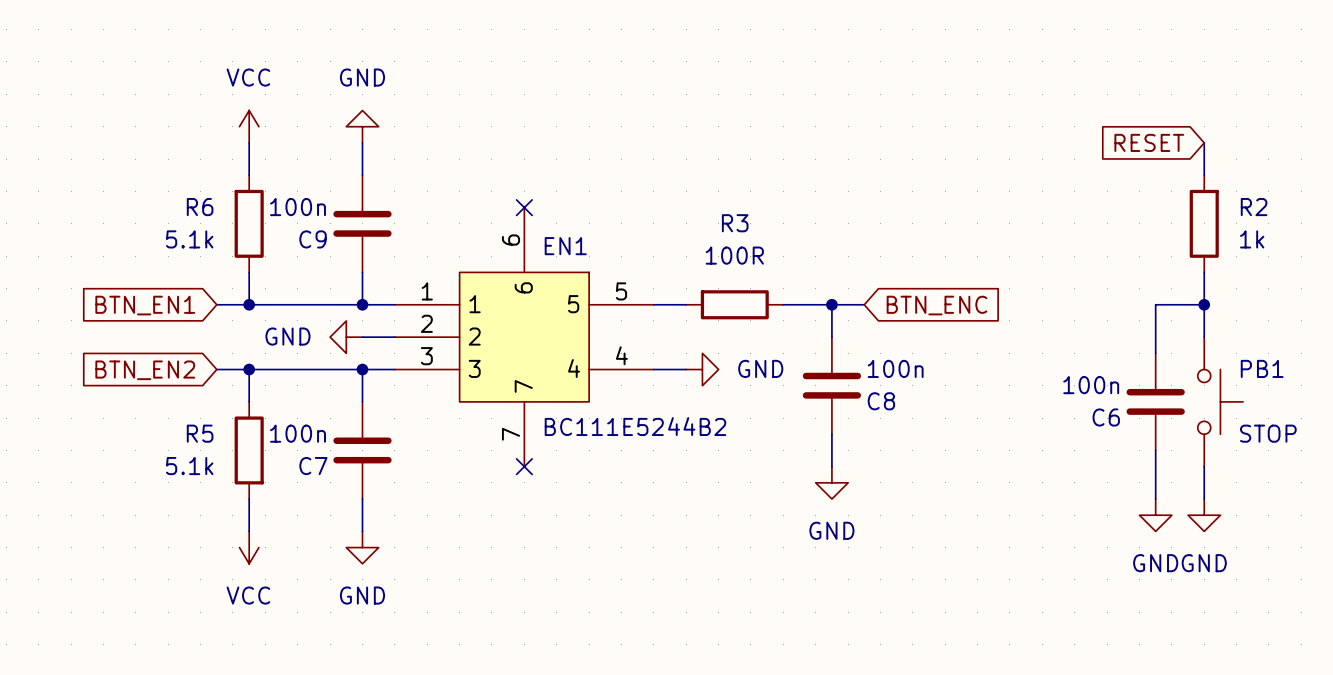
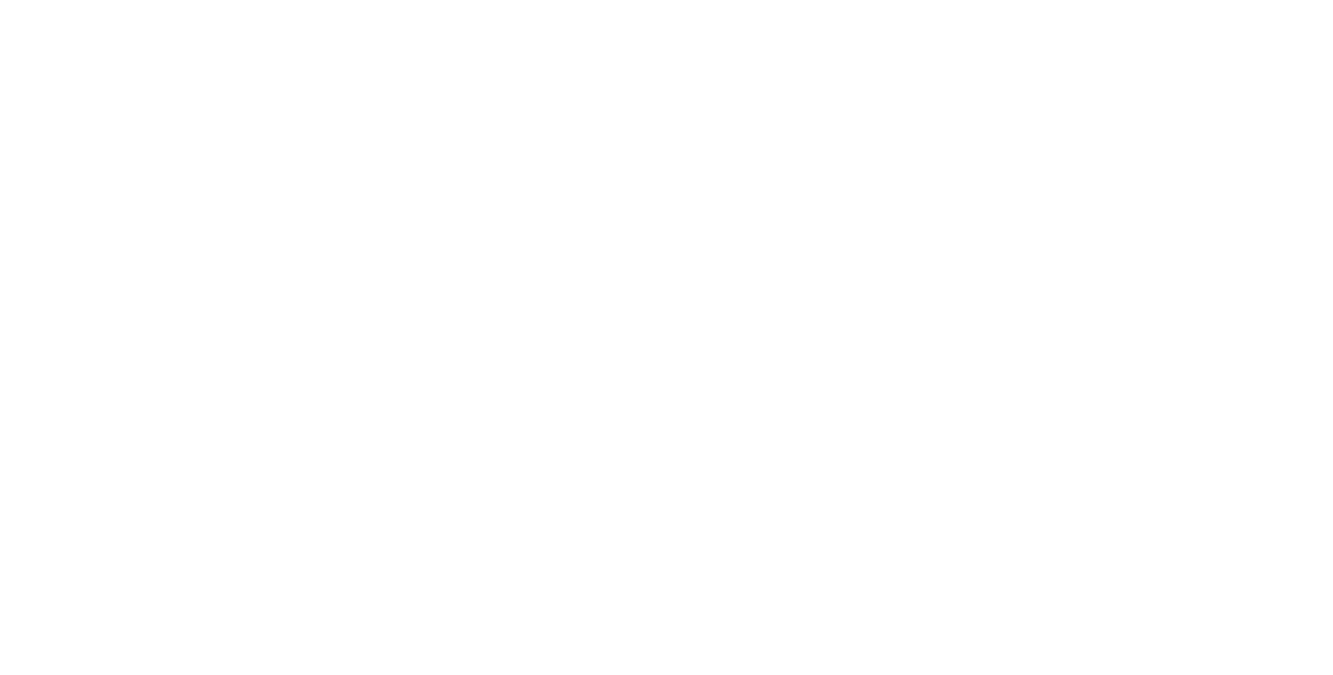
power symbol: VCC (249, 126) -> none
power symbol: GND (362, 126) -> none
wire: (249, 142) (249, 175) -> none
wire: (362, 142) (362, 175) -> none
global label: RESET (1149, 142) -> none
wire: (1204, 142) (1204, 175) -> none
no-connect mark: (524, 207) -> none
R6: 5.1k (249, 223) -> none
C9: 100n (362, 223) -> none
R2: 1k (1204, 223) -> none
wire: (249, 272) (249, 304) -> none
wire: (362, 272) (362, 304) -> none
wire: (1204, 272) (1204, 337) -> none
wire: (216, 304) (394, 304) -> none
junction: (249, 304) -> none
junction: (362, 304) -> none
wire: (653, 304) (686, 304) -> none
R3: 100R (734, 304) -> none
wire: (783, 304) (864, 304) -> none
wire: (831, 304) (831, 337) -> none
junction: (831, 304) -> none
wire: (1204, 304) (1155, 304) (1155, 353) -> none
junction: (1204, 304) -> none
global label: BTN_EN1 (145, 305) -> none
global label: BTN_ENC (936, 305) -> none
power symbol: GND (346, 337) -> none
wire: (362, 337) (394, 337) -> none
EN1: BC111E5244B2 (524, 337) -> none
wire: (216, 369) (394, 369) -> none
wire: (249, 369) (249, 401) -> none
junction: (249, 369) -> none
wire: (362, 369) (362, 401) -> none
junction: (362, 369) -> none
wire: (653, 369) (686, 369) -> none
power symbol: GND (702, 369) -> none
global label: BTN_EN2 (145, 370) -> none
C8: 100n (831, 385) -> none
C6: 100n (1155, 401) -> none
PB1: STOP (1220, 401) -> none
wire: (831, 434) (831, 466) -> none
R5: 5.1k (249, 450) -> none
C7: 100n (362, 450) -> none
wire: (1155, 450) (1155, 499) -> none
no-connect mark: (524, 466) -> none
wire: (1204, 466) (1204, 499) -> none
power symbol: GND (831, 482) -> none
wire: (249, 499) (249, 531) -> none
wire: (362, 499) (362, 531) -> none
power symbol: GND (1155, 515) -> none
power symbol: GND (1204, 515) -> none
power symbol: VCC (249, 547) -> none
power symbol: GND (362, 547) -> none

